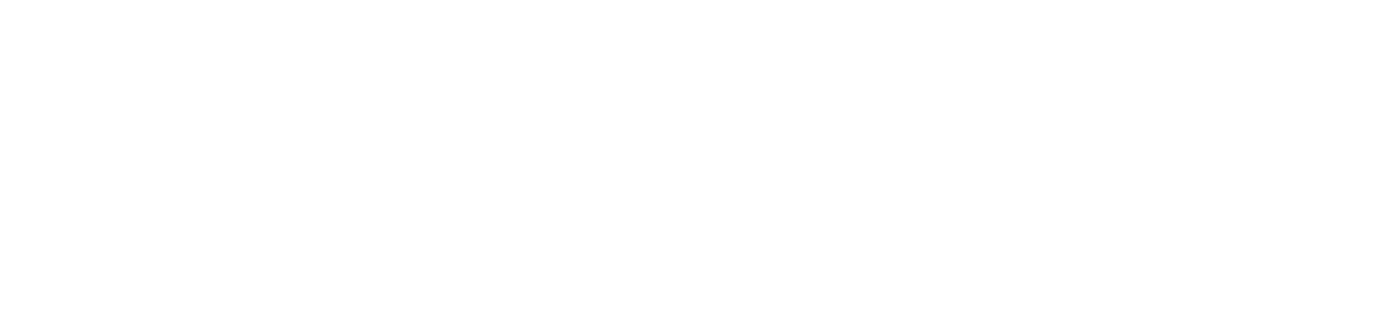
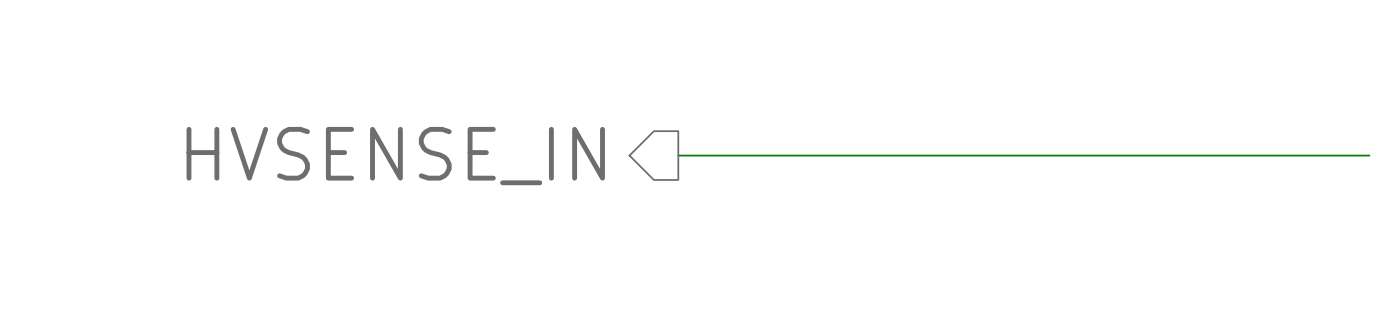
wire: none -> (678, 155) (1369, 155)
hierarchical label: none -> HVSENSE_IN (395, 156)

